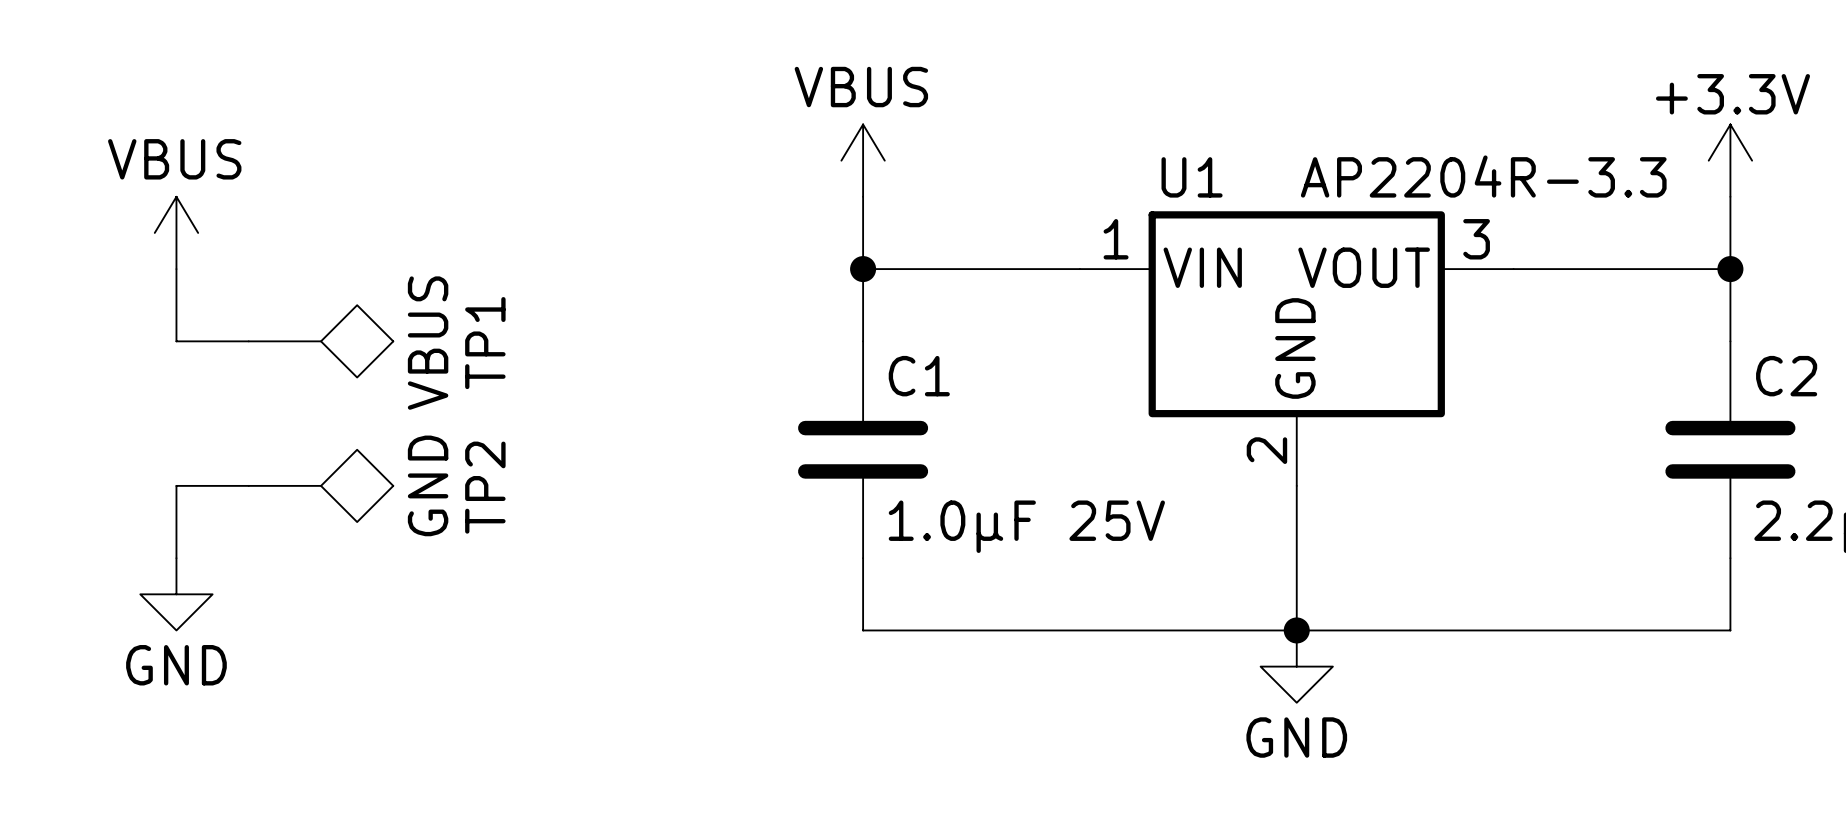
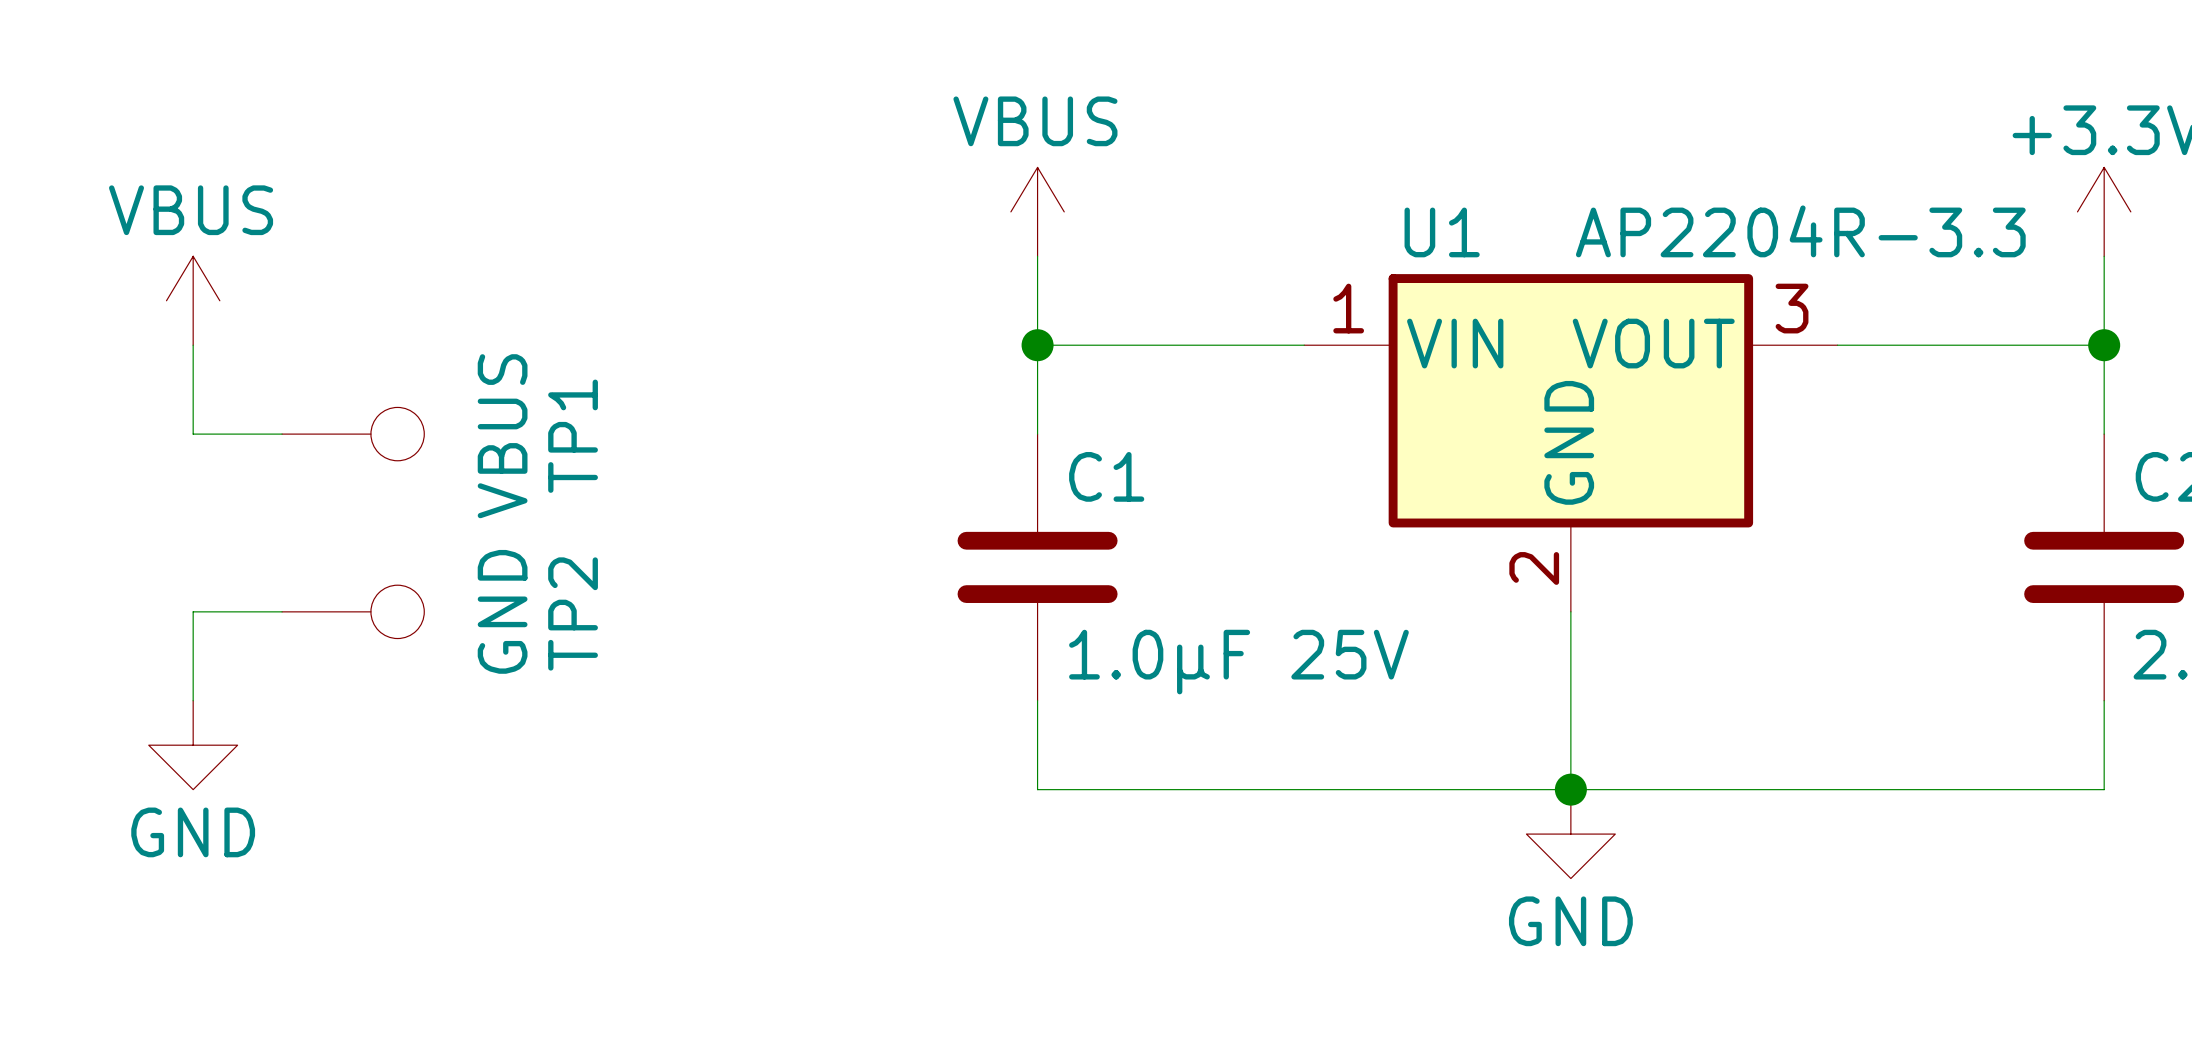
TP1 symbol: [248, 305, 394, 378] -> [282, 407, 425, 461]
TP2 symbol: [248, 449, 394, 523] -> [282, 585, 425, 639]

